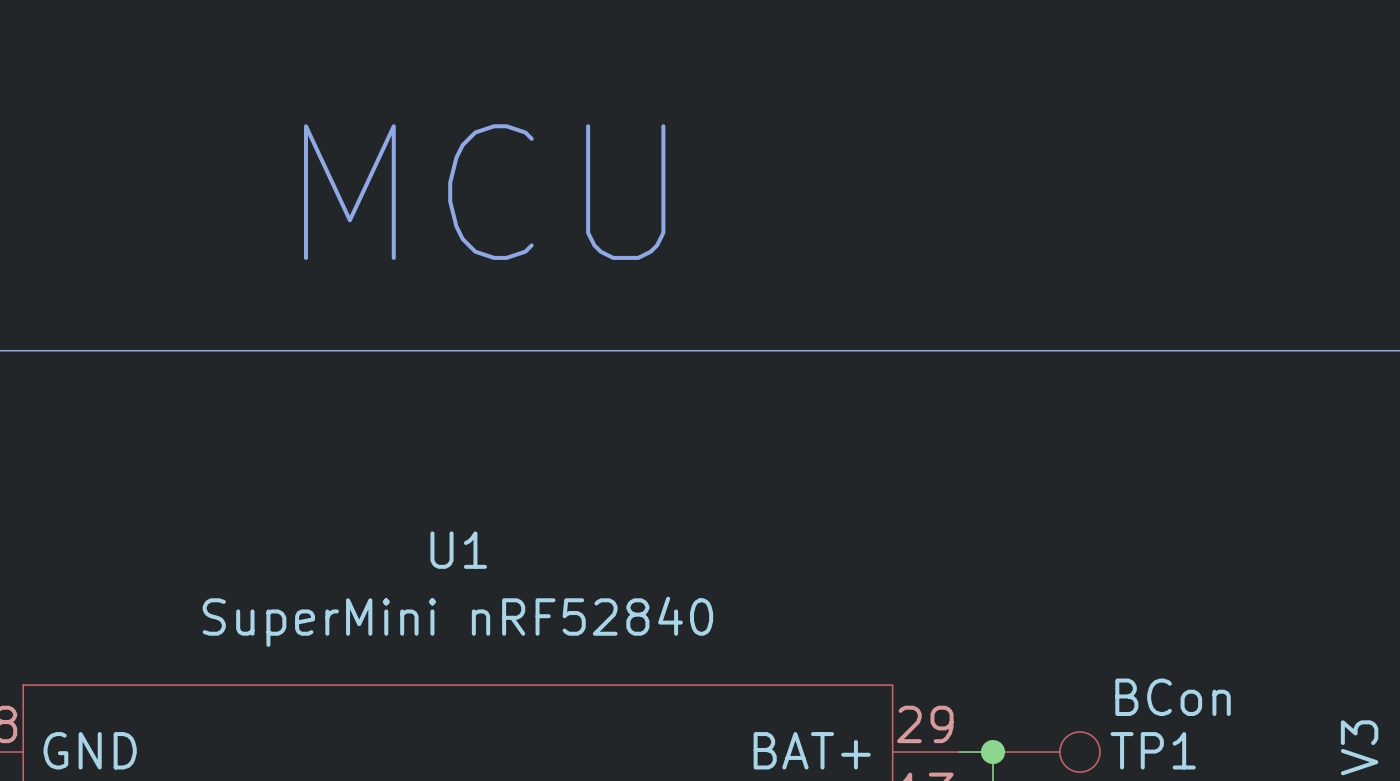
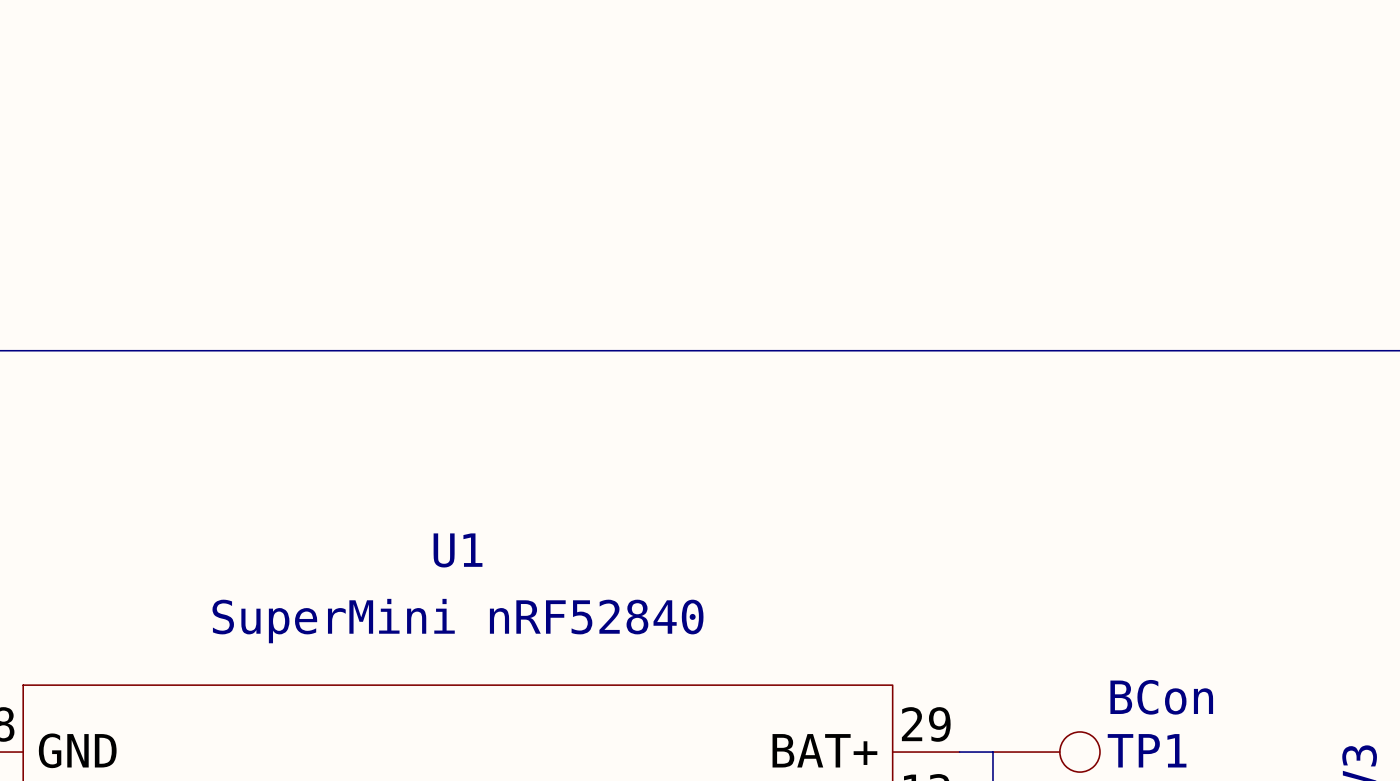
text: MCU (484, 192) -> none
junction: (992, 752) -> none

